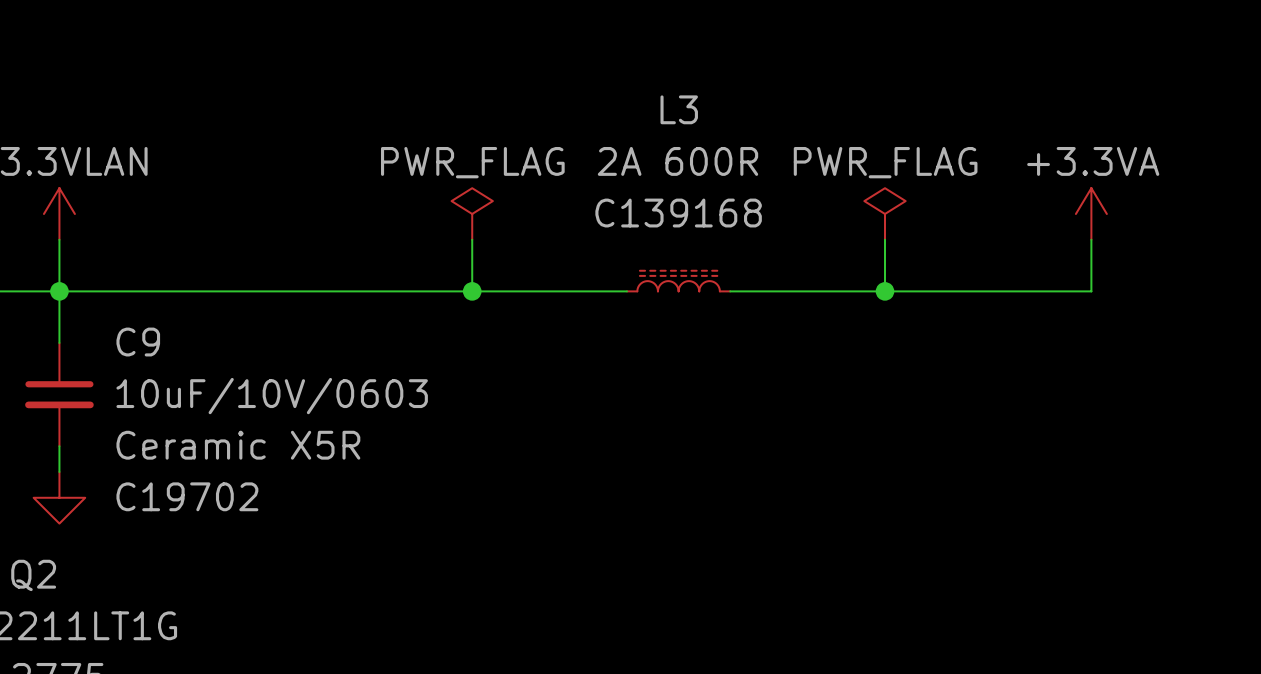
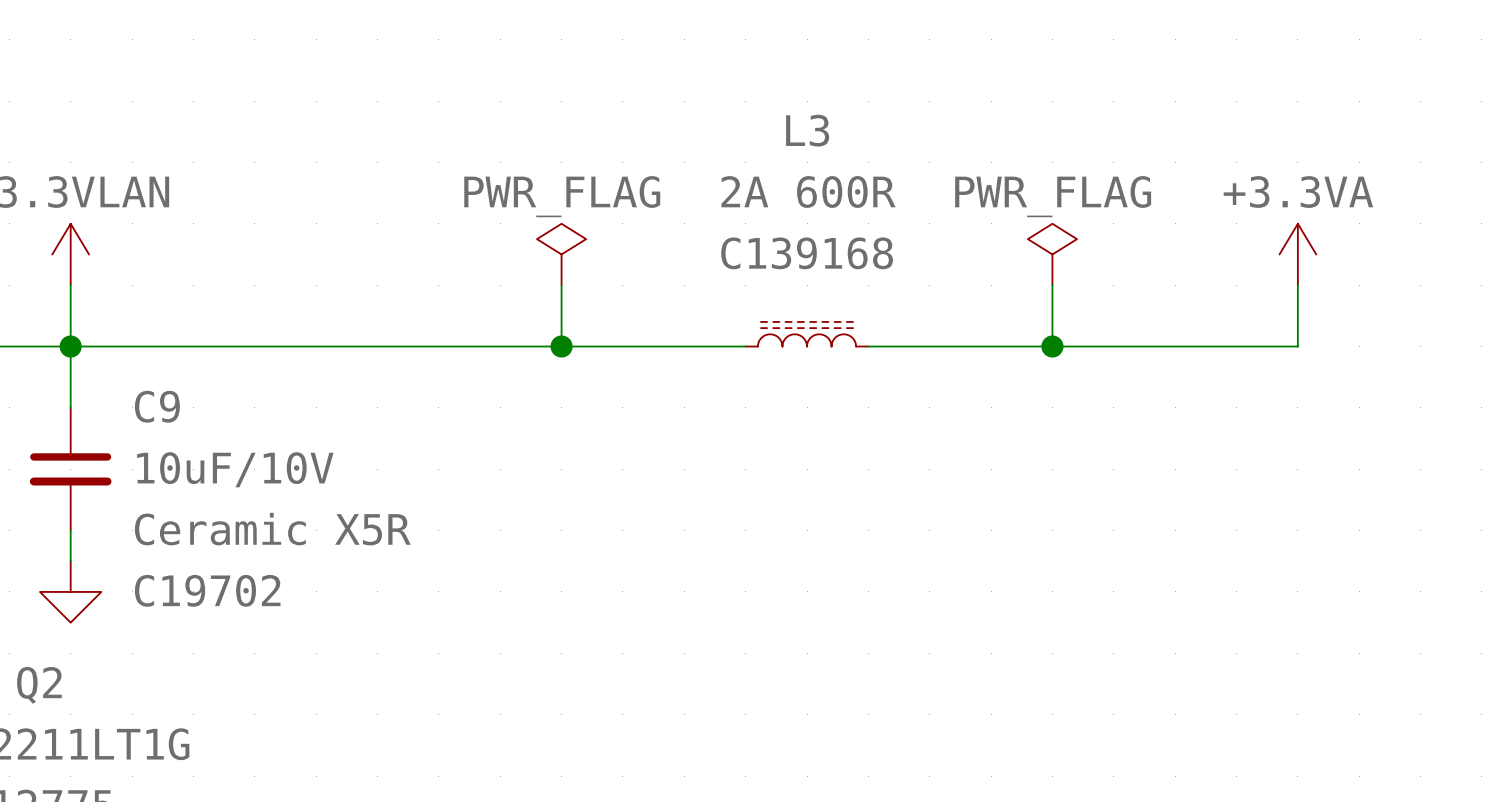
C9 value: 10uF/10V/0603 (272, 396) -> 10uF/10V (235, 469)

